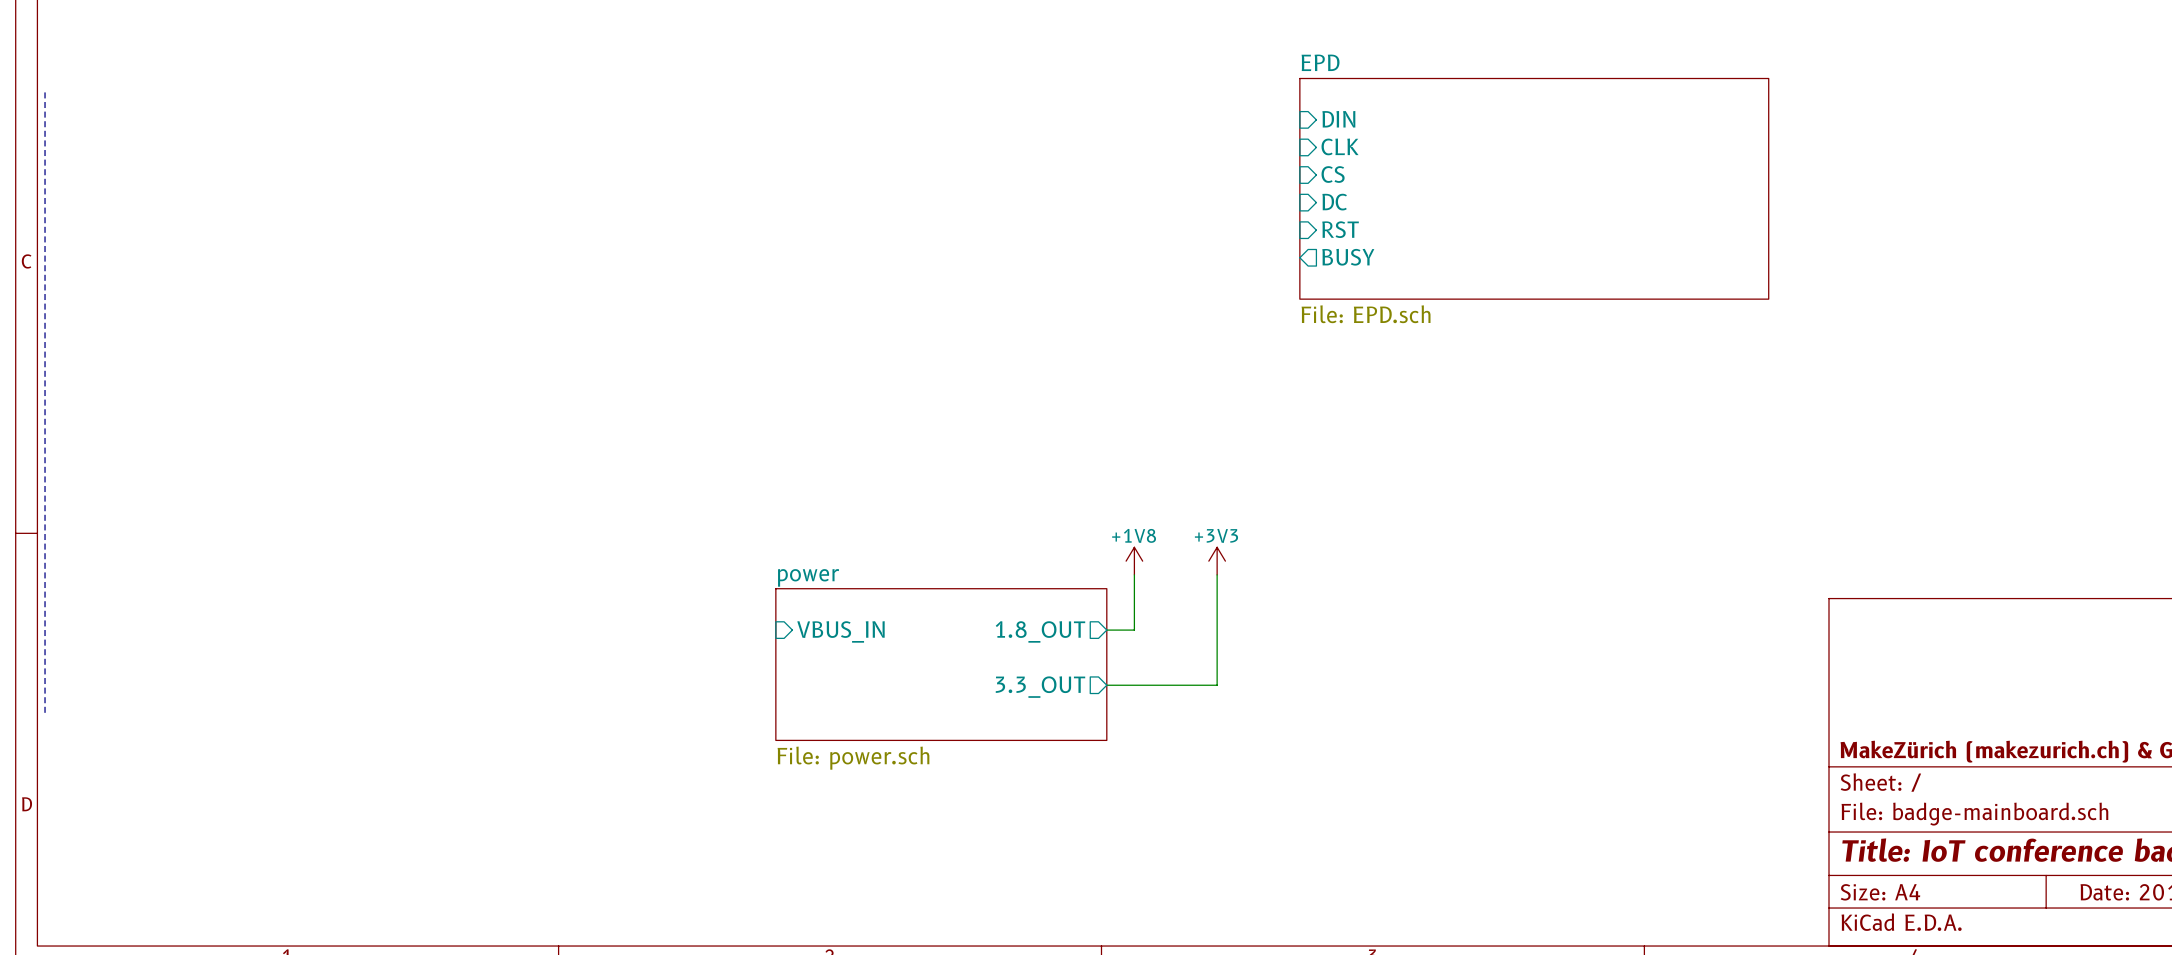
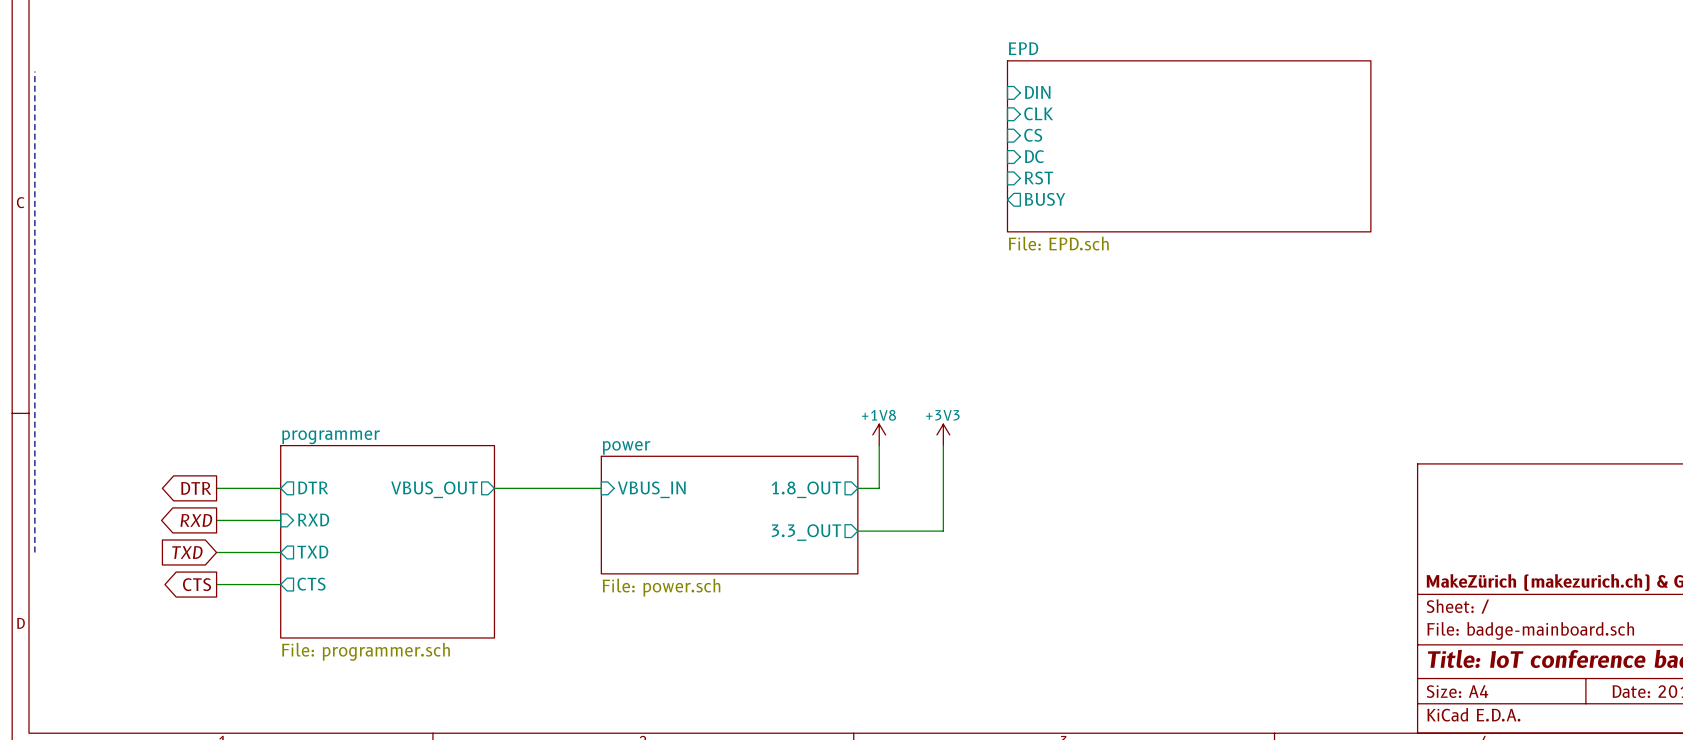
sheet pin: none -> DTR (313, 487)
global label: none -> DTR (196, 488)
wire: none -> (216, 488) (280, 488)
wire: none -> (494, 488) (601, 488)
sheet pin: none -> VBUS_OUT (434, 489)
sheet pin: none -> RXD (313, 519)
global label: none -> RXD (196, 520)
wire: none -> (216, 520) (280, 520)
sheet programmer: none -> File: programmer.sch (387, 541)
global label: none -> TXD (187, 552)
wire: none -> (216, 552) (280, 552)
sheet pin: none -> TXD (312, 552)
sheet pin: none -> CTS (311, 584)
global label: none -> CTS (197, 584)
wire: none -> (216, 584) (280, 584)

